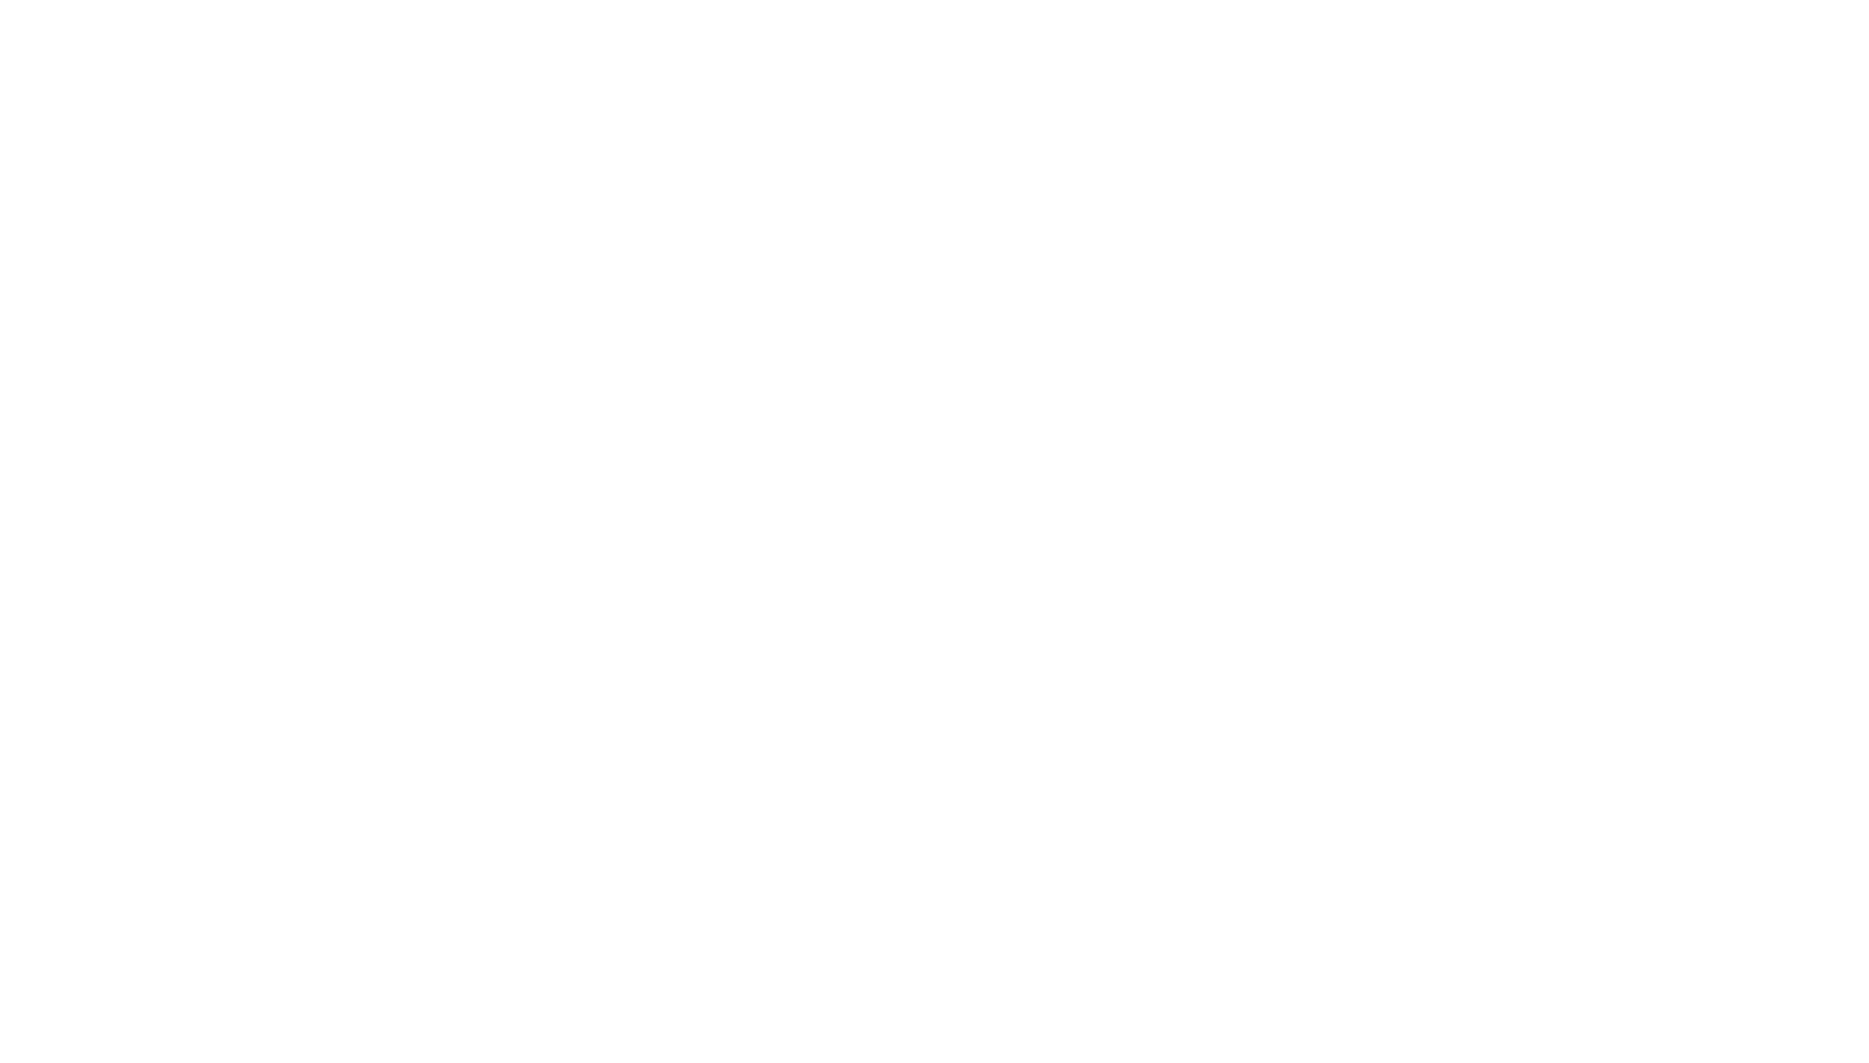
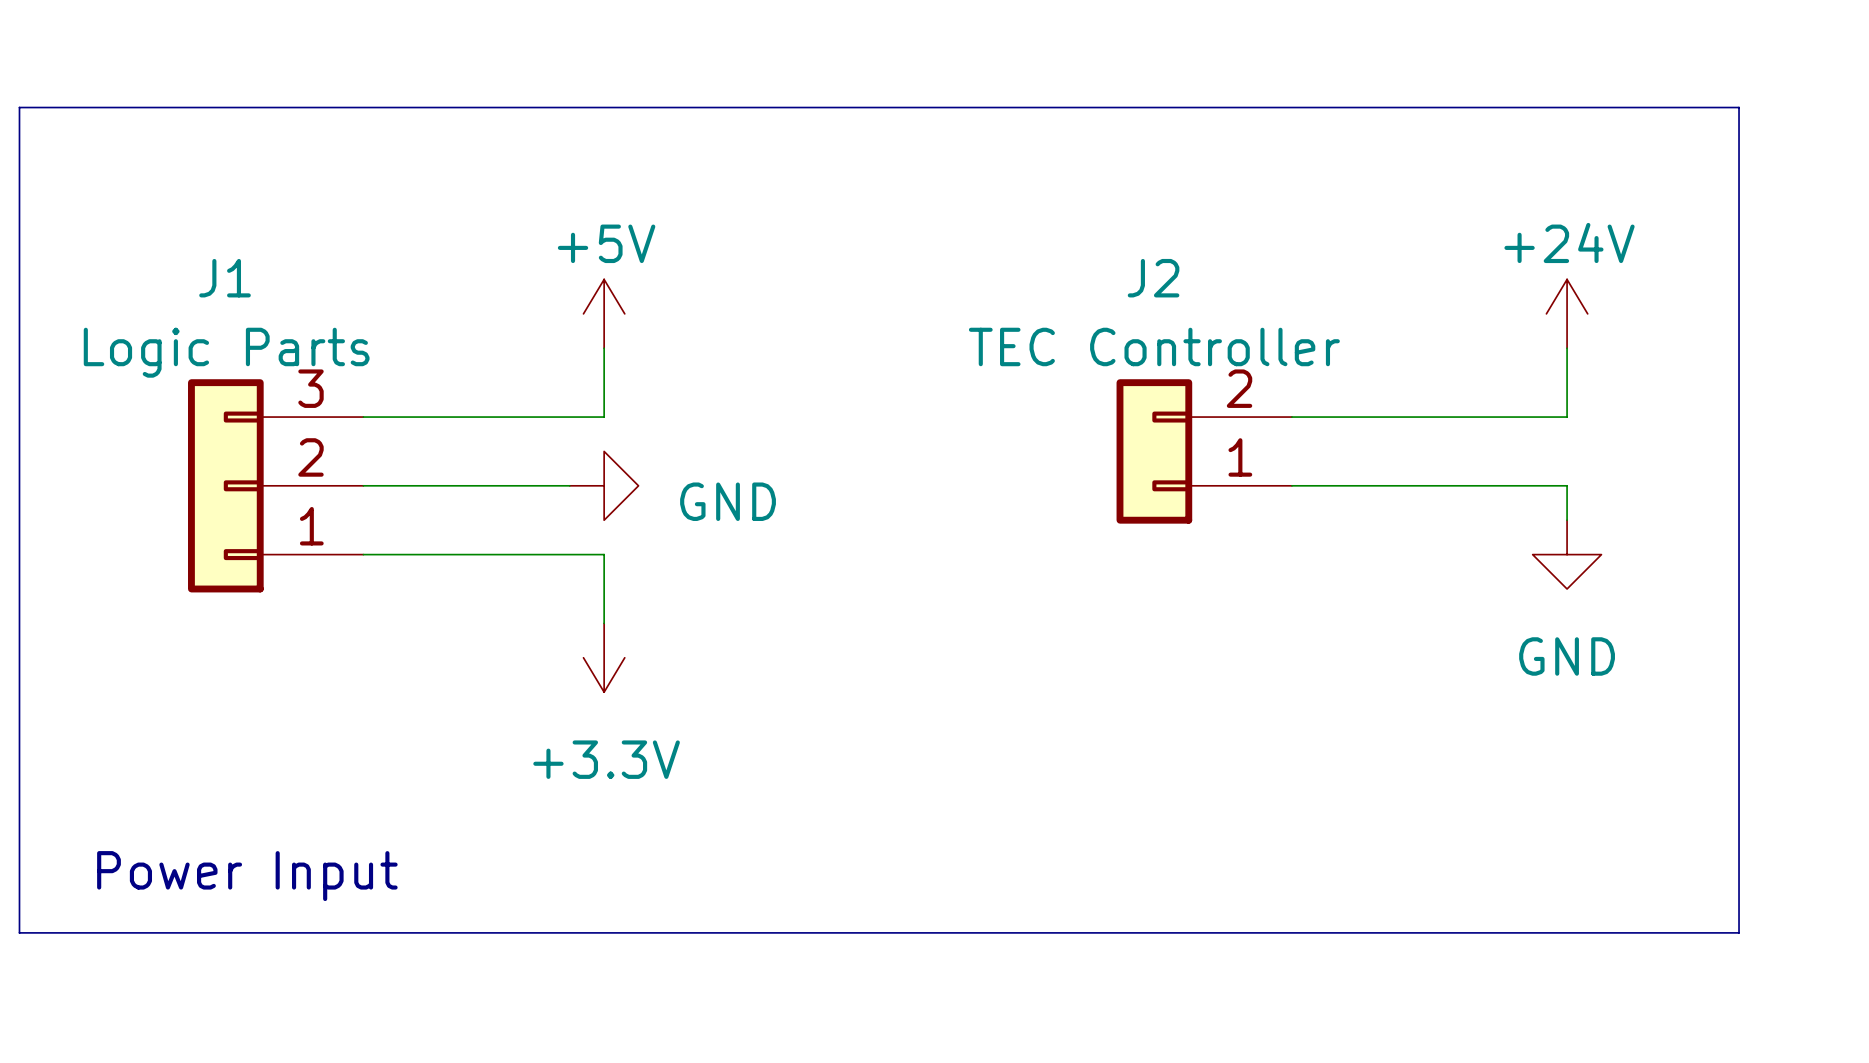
line: none -> (19, 107) (1739, 107) (1739, 932) (19, 932) (19, 107)
power symbol: none -> +5V (604, 313)
power symbol: none -> +24V (1567, 313)
wire: none -> (604, 348) (604, 417) (363, 417)
wire: none -> (1567, 348) (1567, 417) (1291, 417)
J2: none -> TEC Controller (1204, 451)
J1: none -> Logic Parts (275, 485)
wire: none -> (363, 485) (569, 485)
power symbol: none -> GND (604, 485)
wire: none -> (1291, 485) (1567, 485) (1567, 520)
wire: none -> (363, 554) (604, 554) (604, 623)
power symbol: none -> GND (1567, 554)
power symbol: none -> +3.3V (604, 657)
text: none -> Power Input (247, 876)

